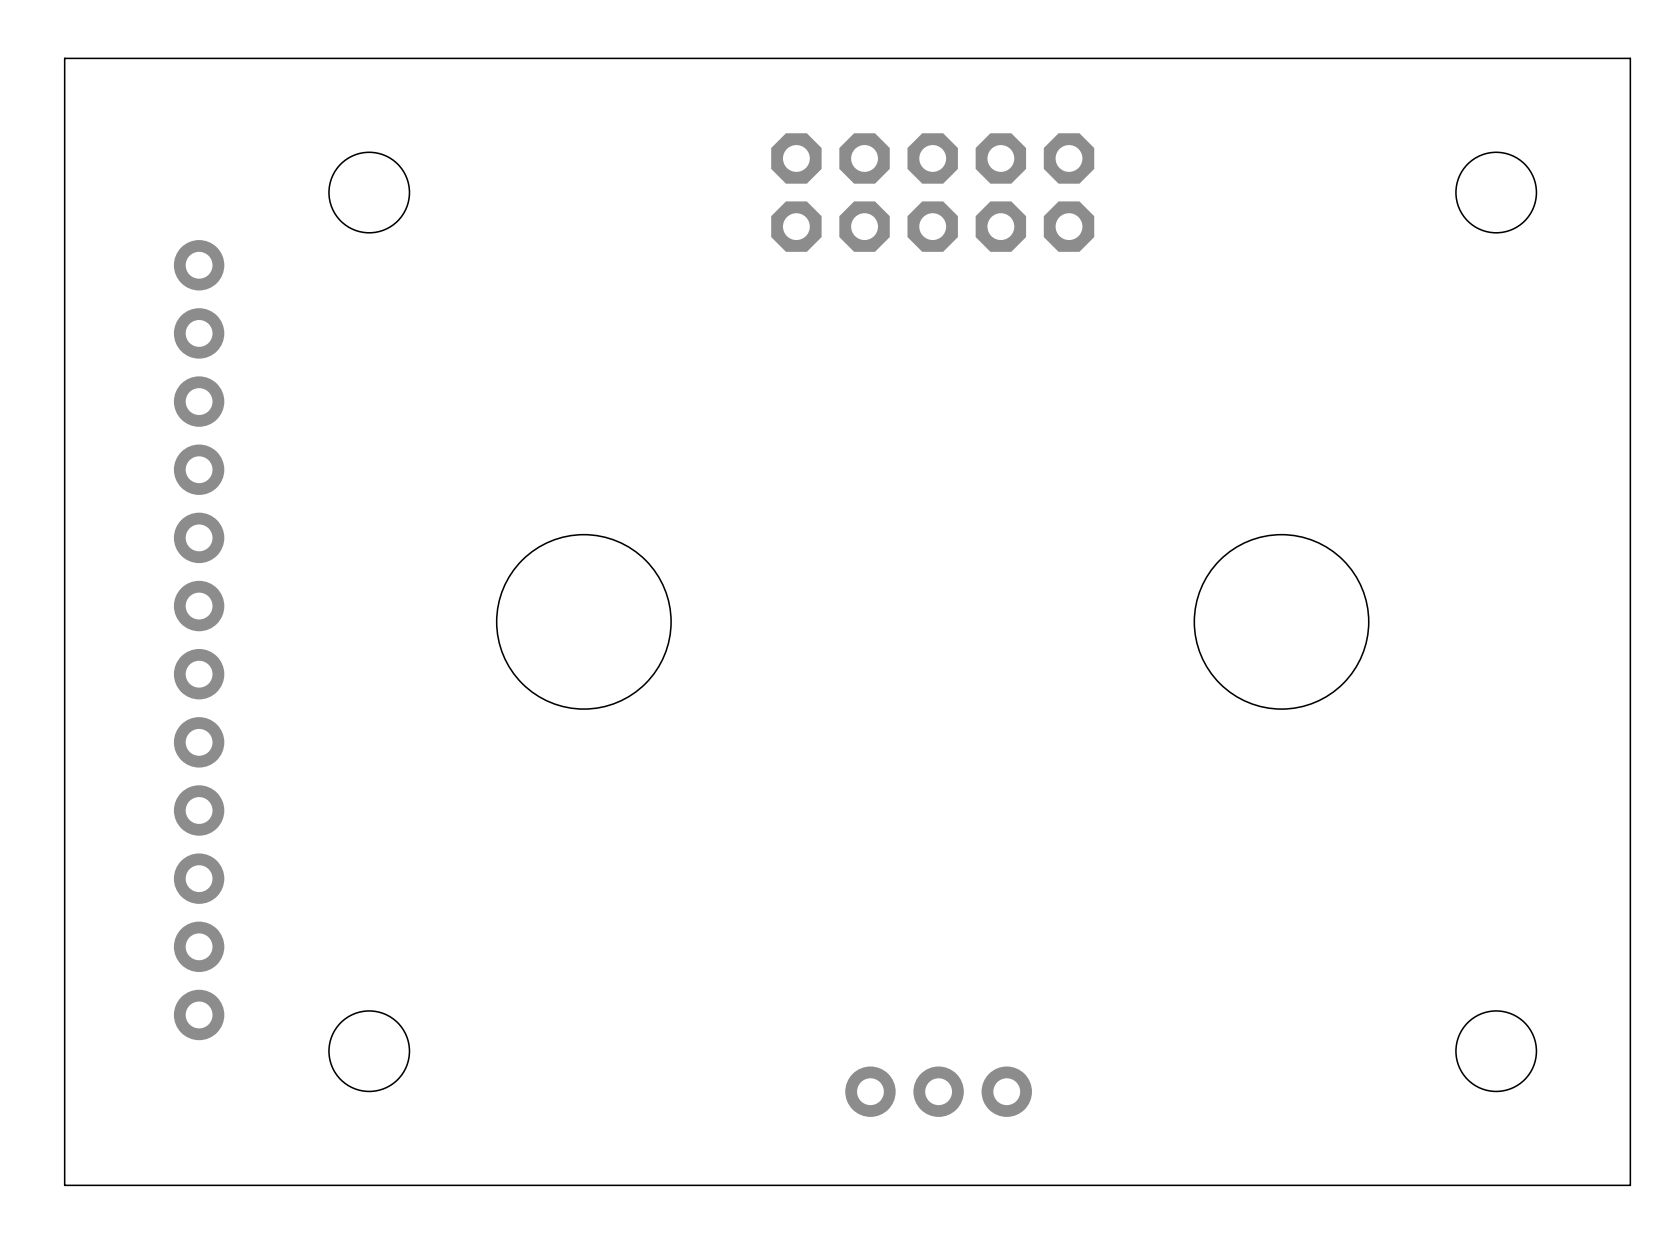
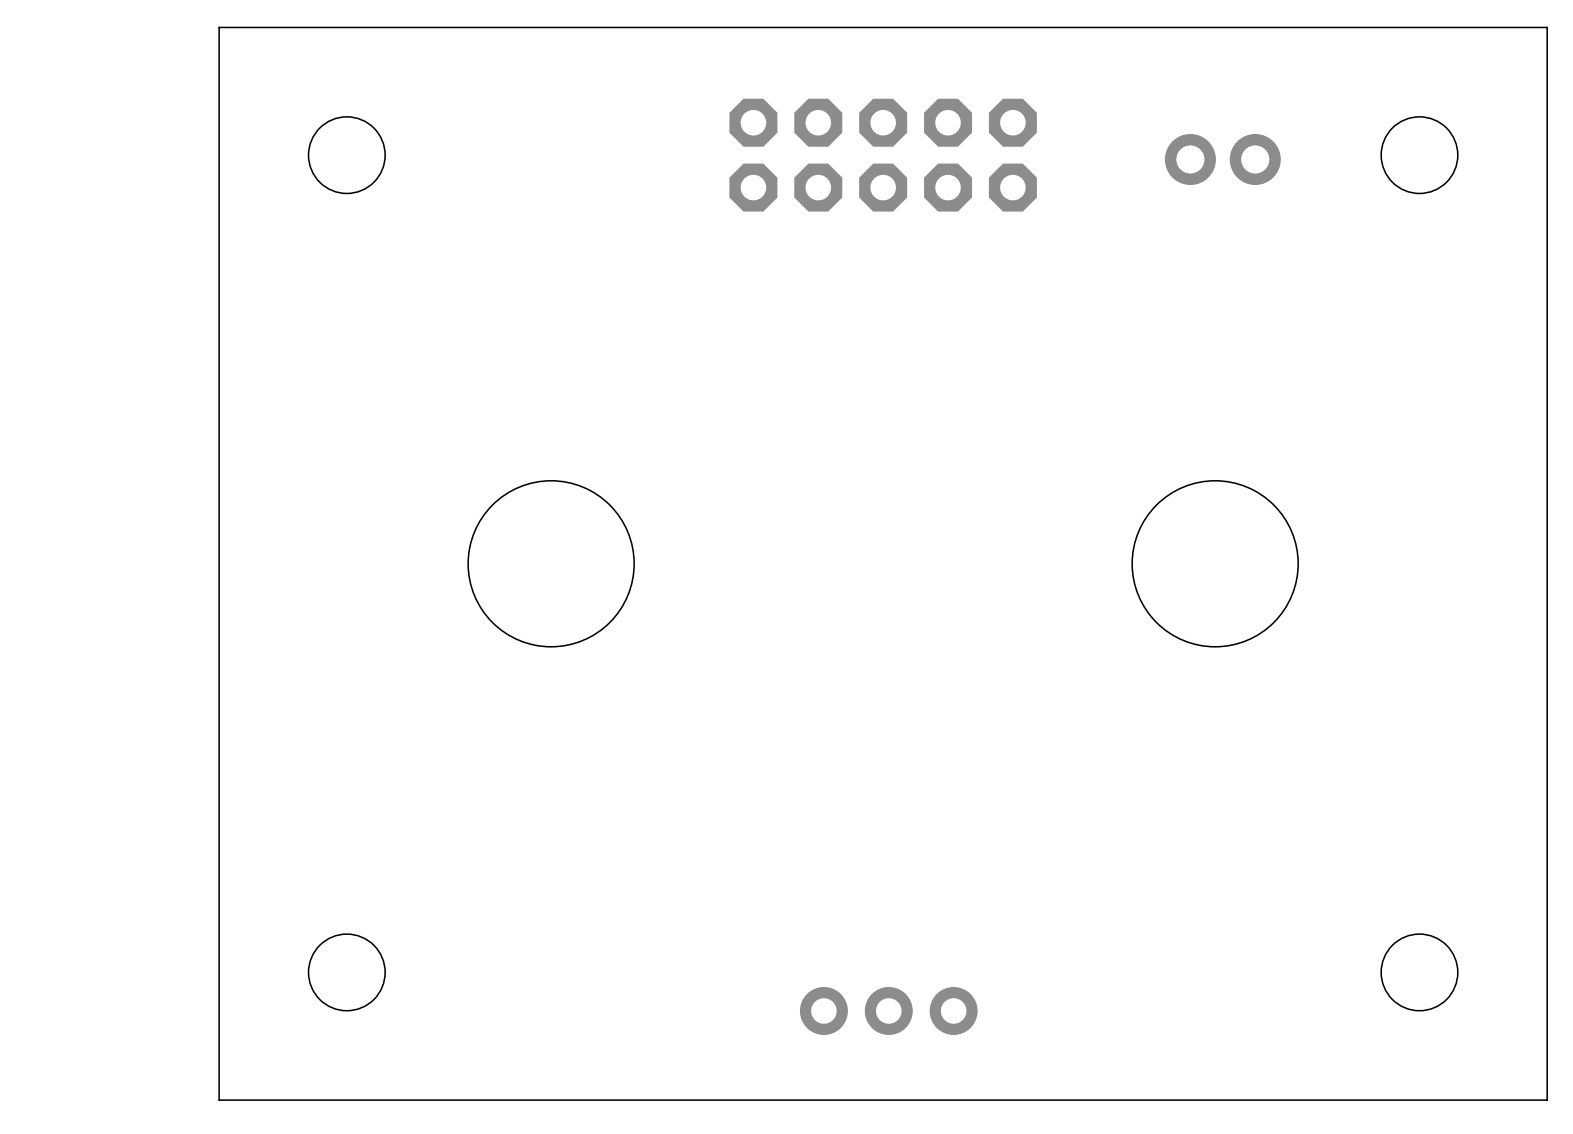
board edge: (235, 58) (64, 58) (64, 1185) (235, 1185) -> (219, 27) (219, 1100)
part: none -> (1222, 159)
part: (199, 640) -> none

